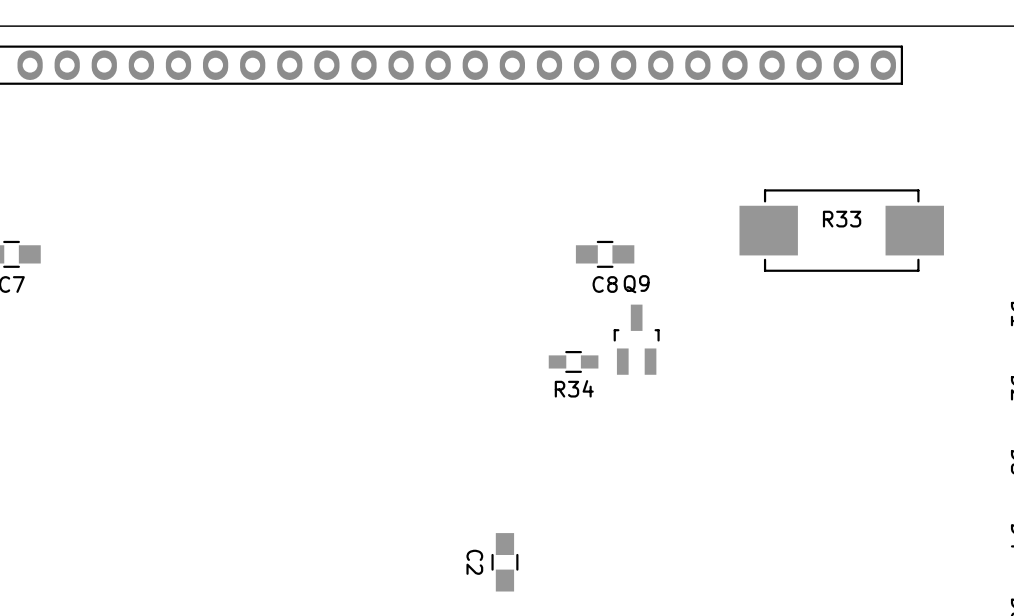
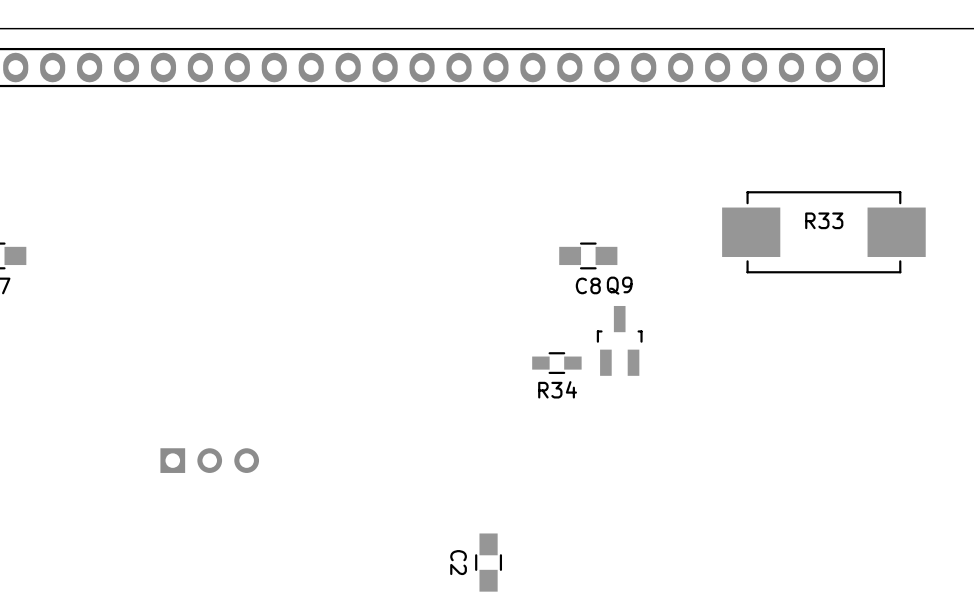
part: none -> (209, 460)

